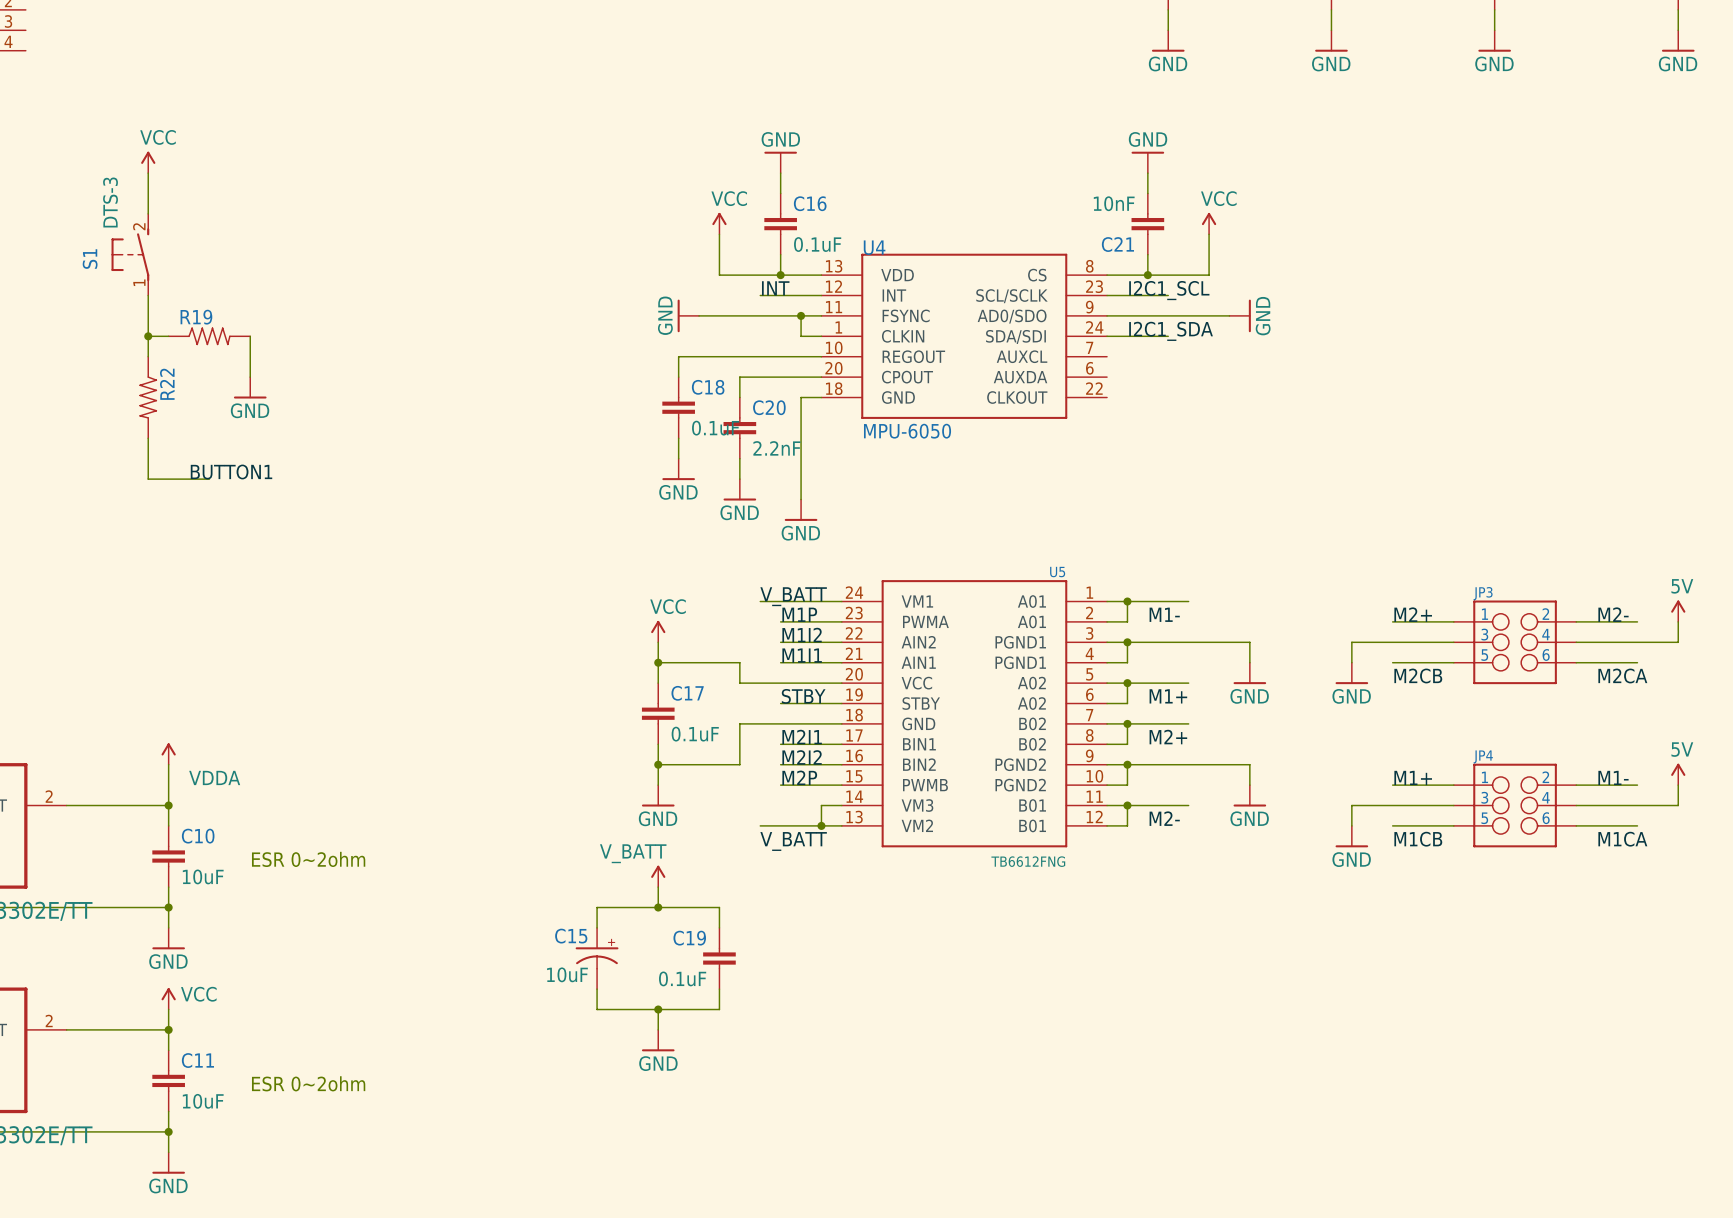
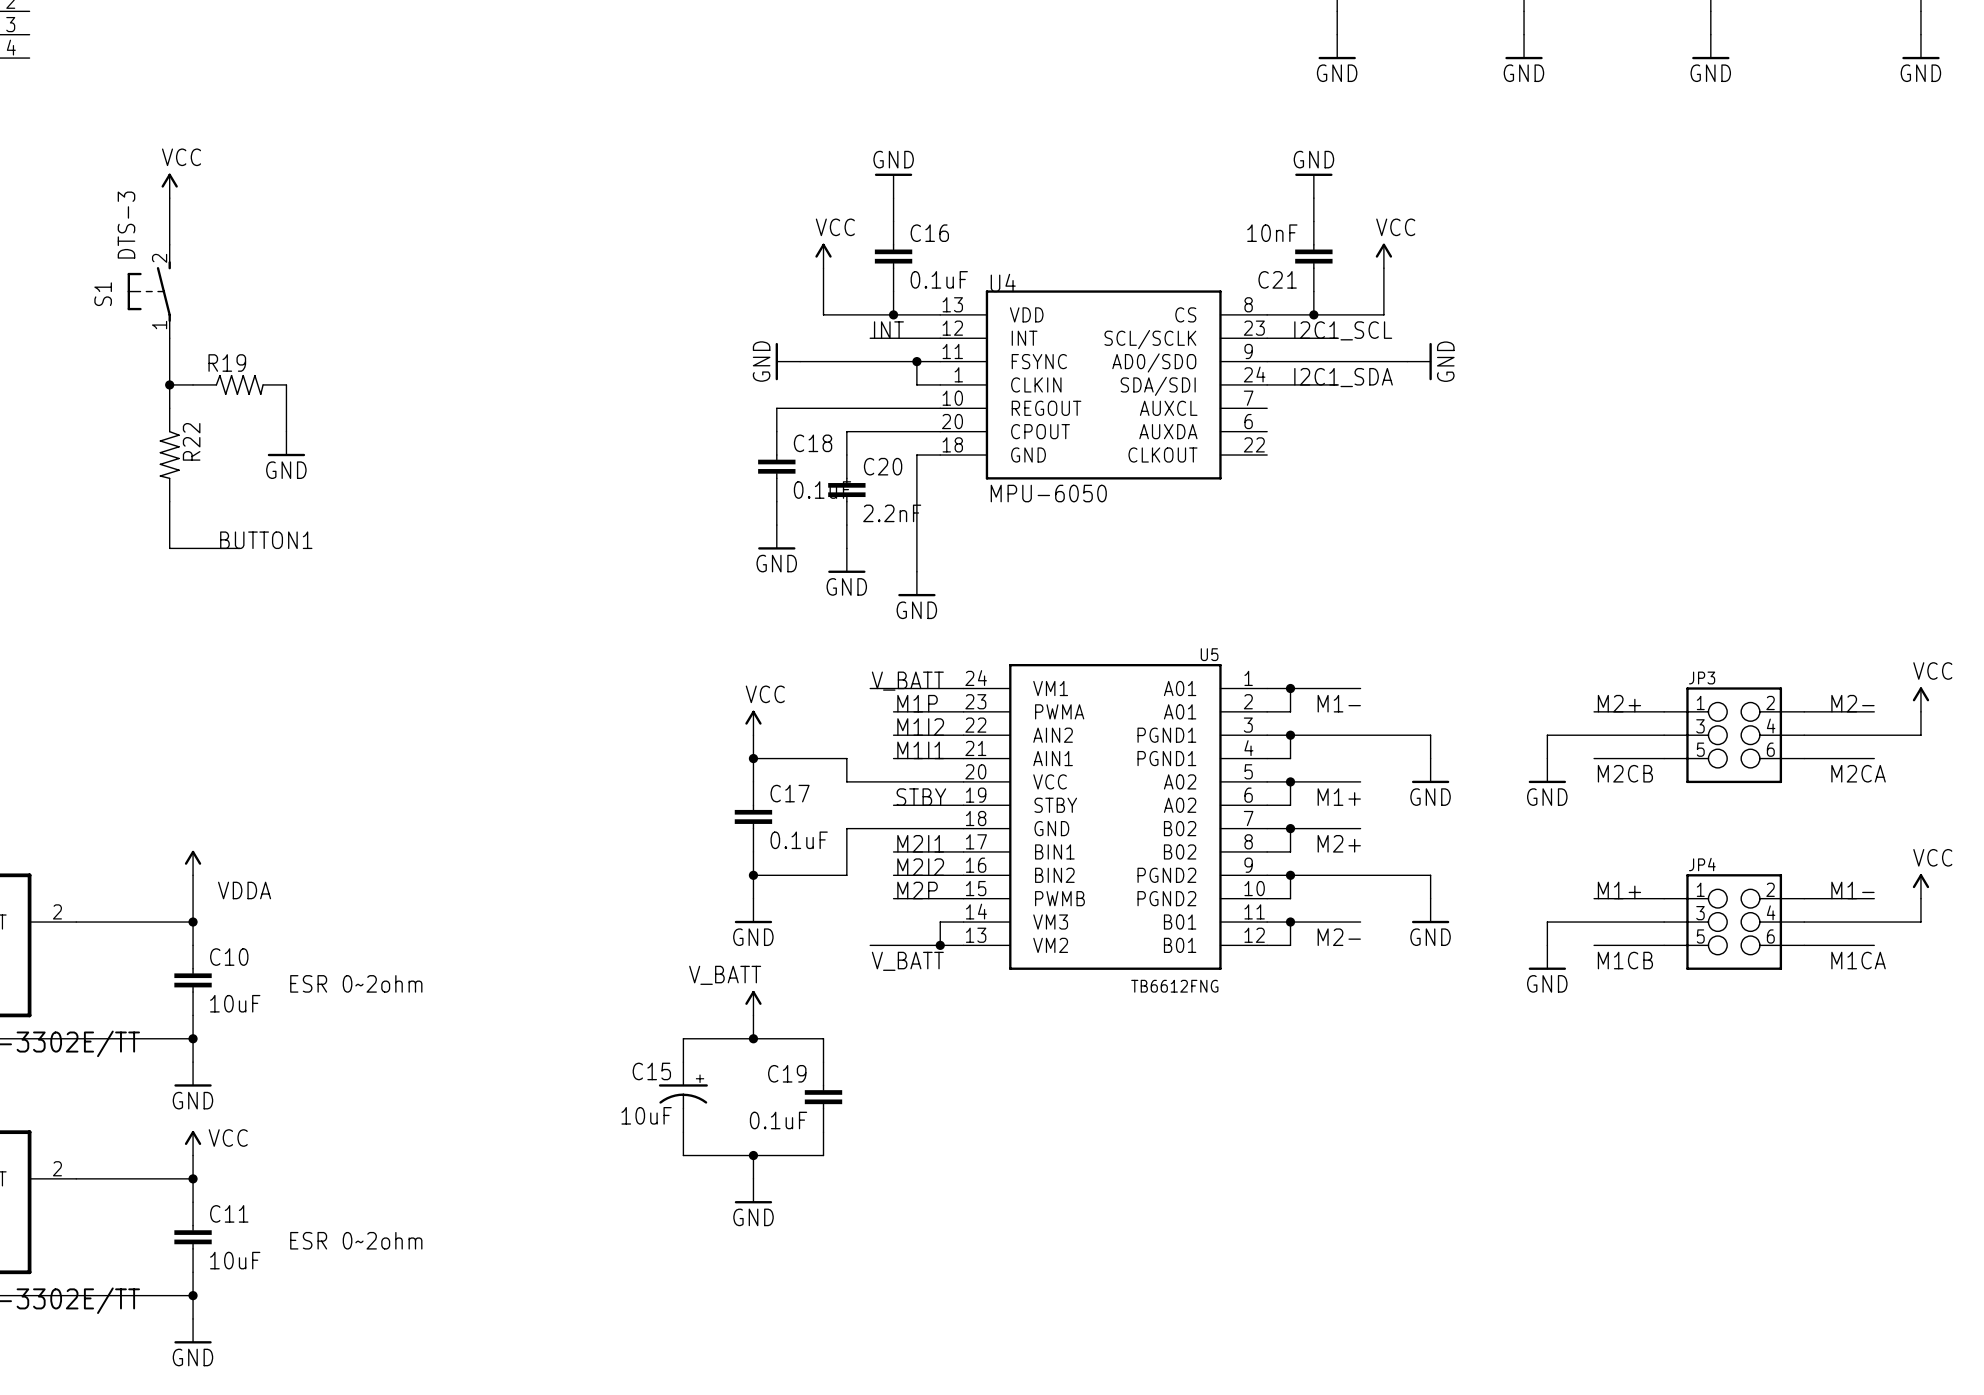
power symbol: 5V (1678, 611) -> VCC (1920, 699)
power symbol: 5V (1678, 774) -> VCC (1920, 886)

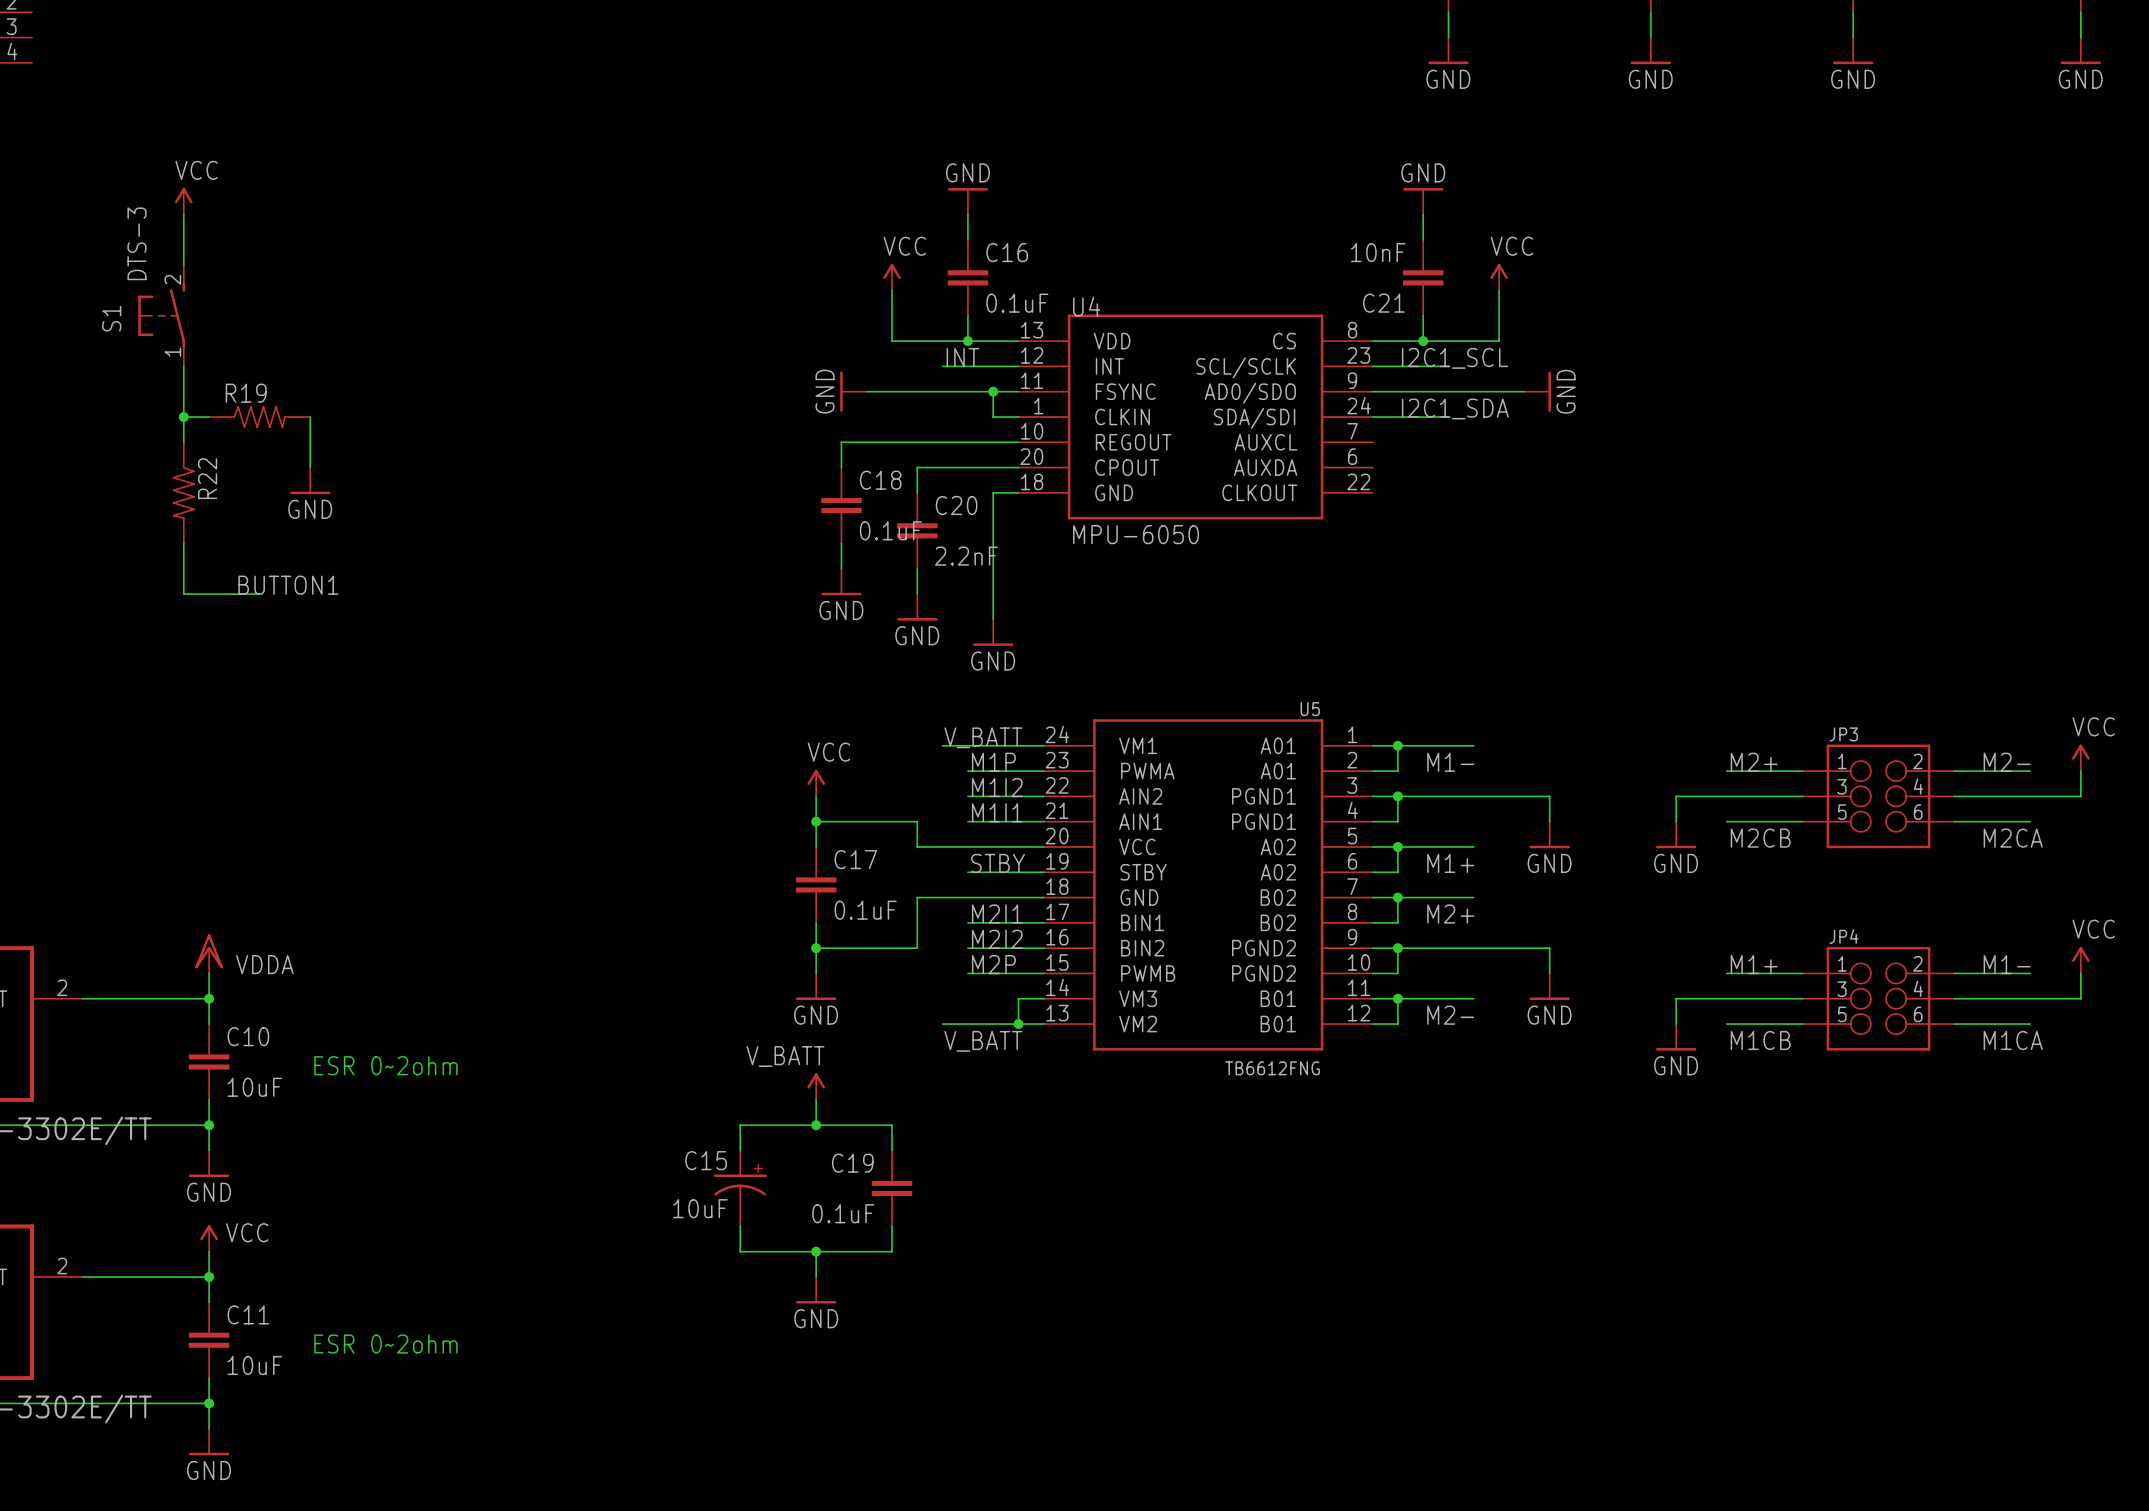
power symbol: VDDA (193, 863) -> none
power symbol: none -> VDDA (209, 953)

